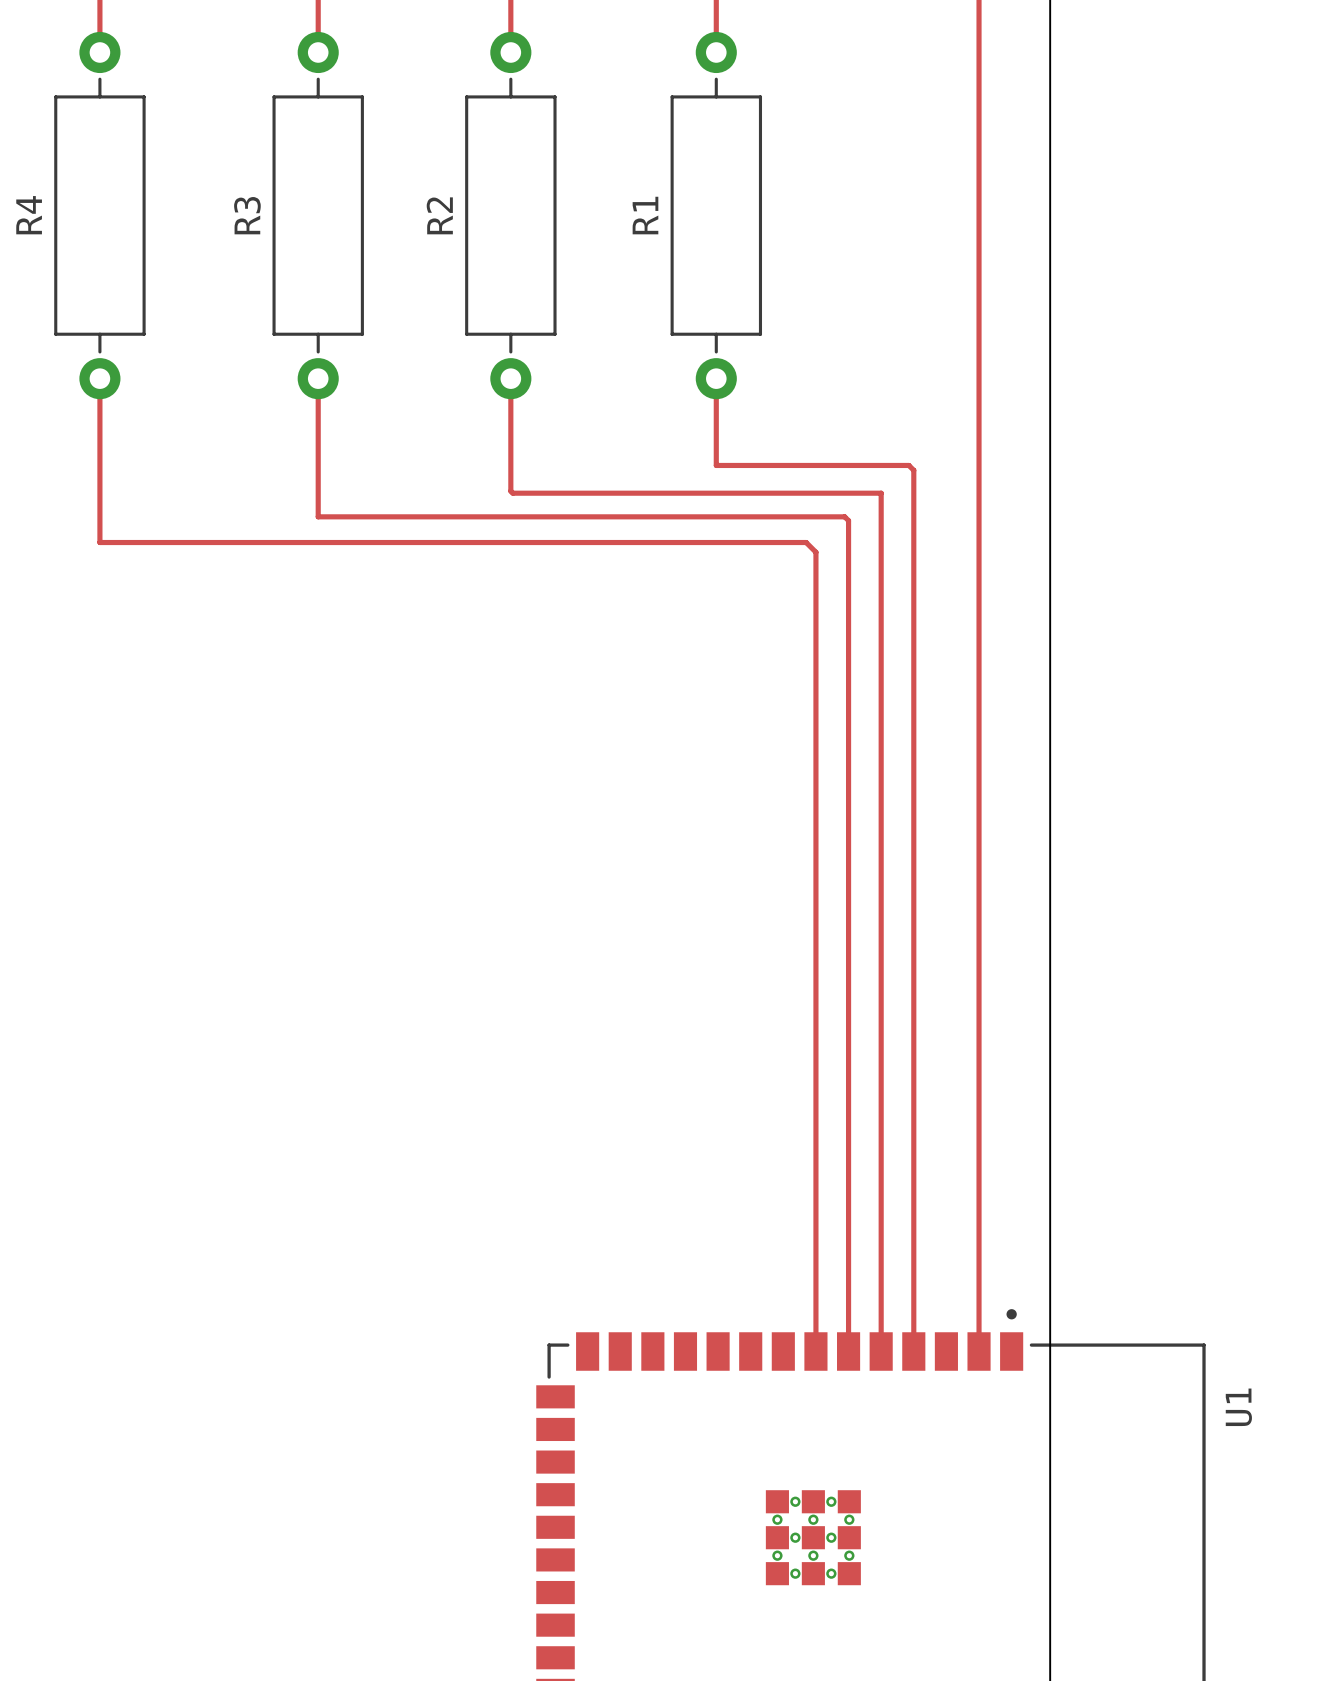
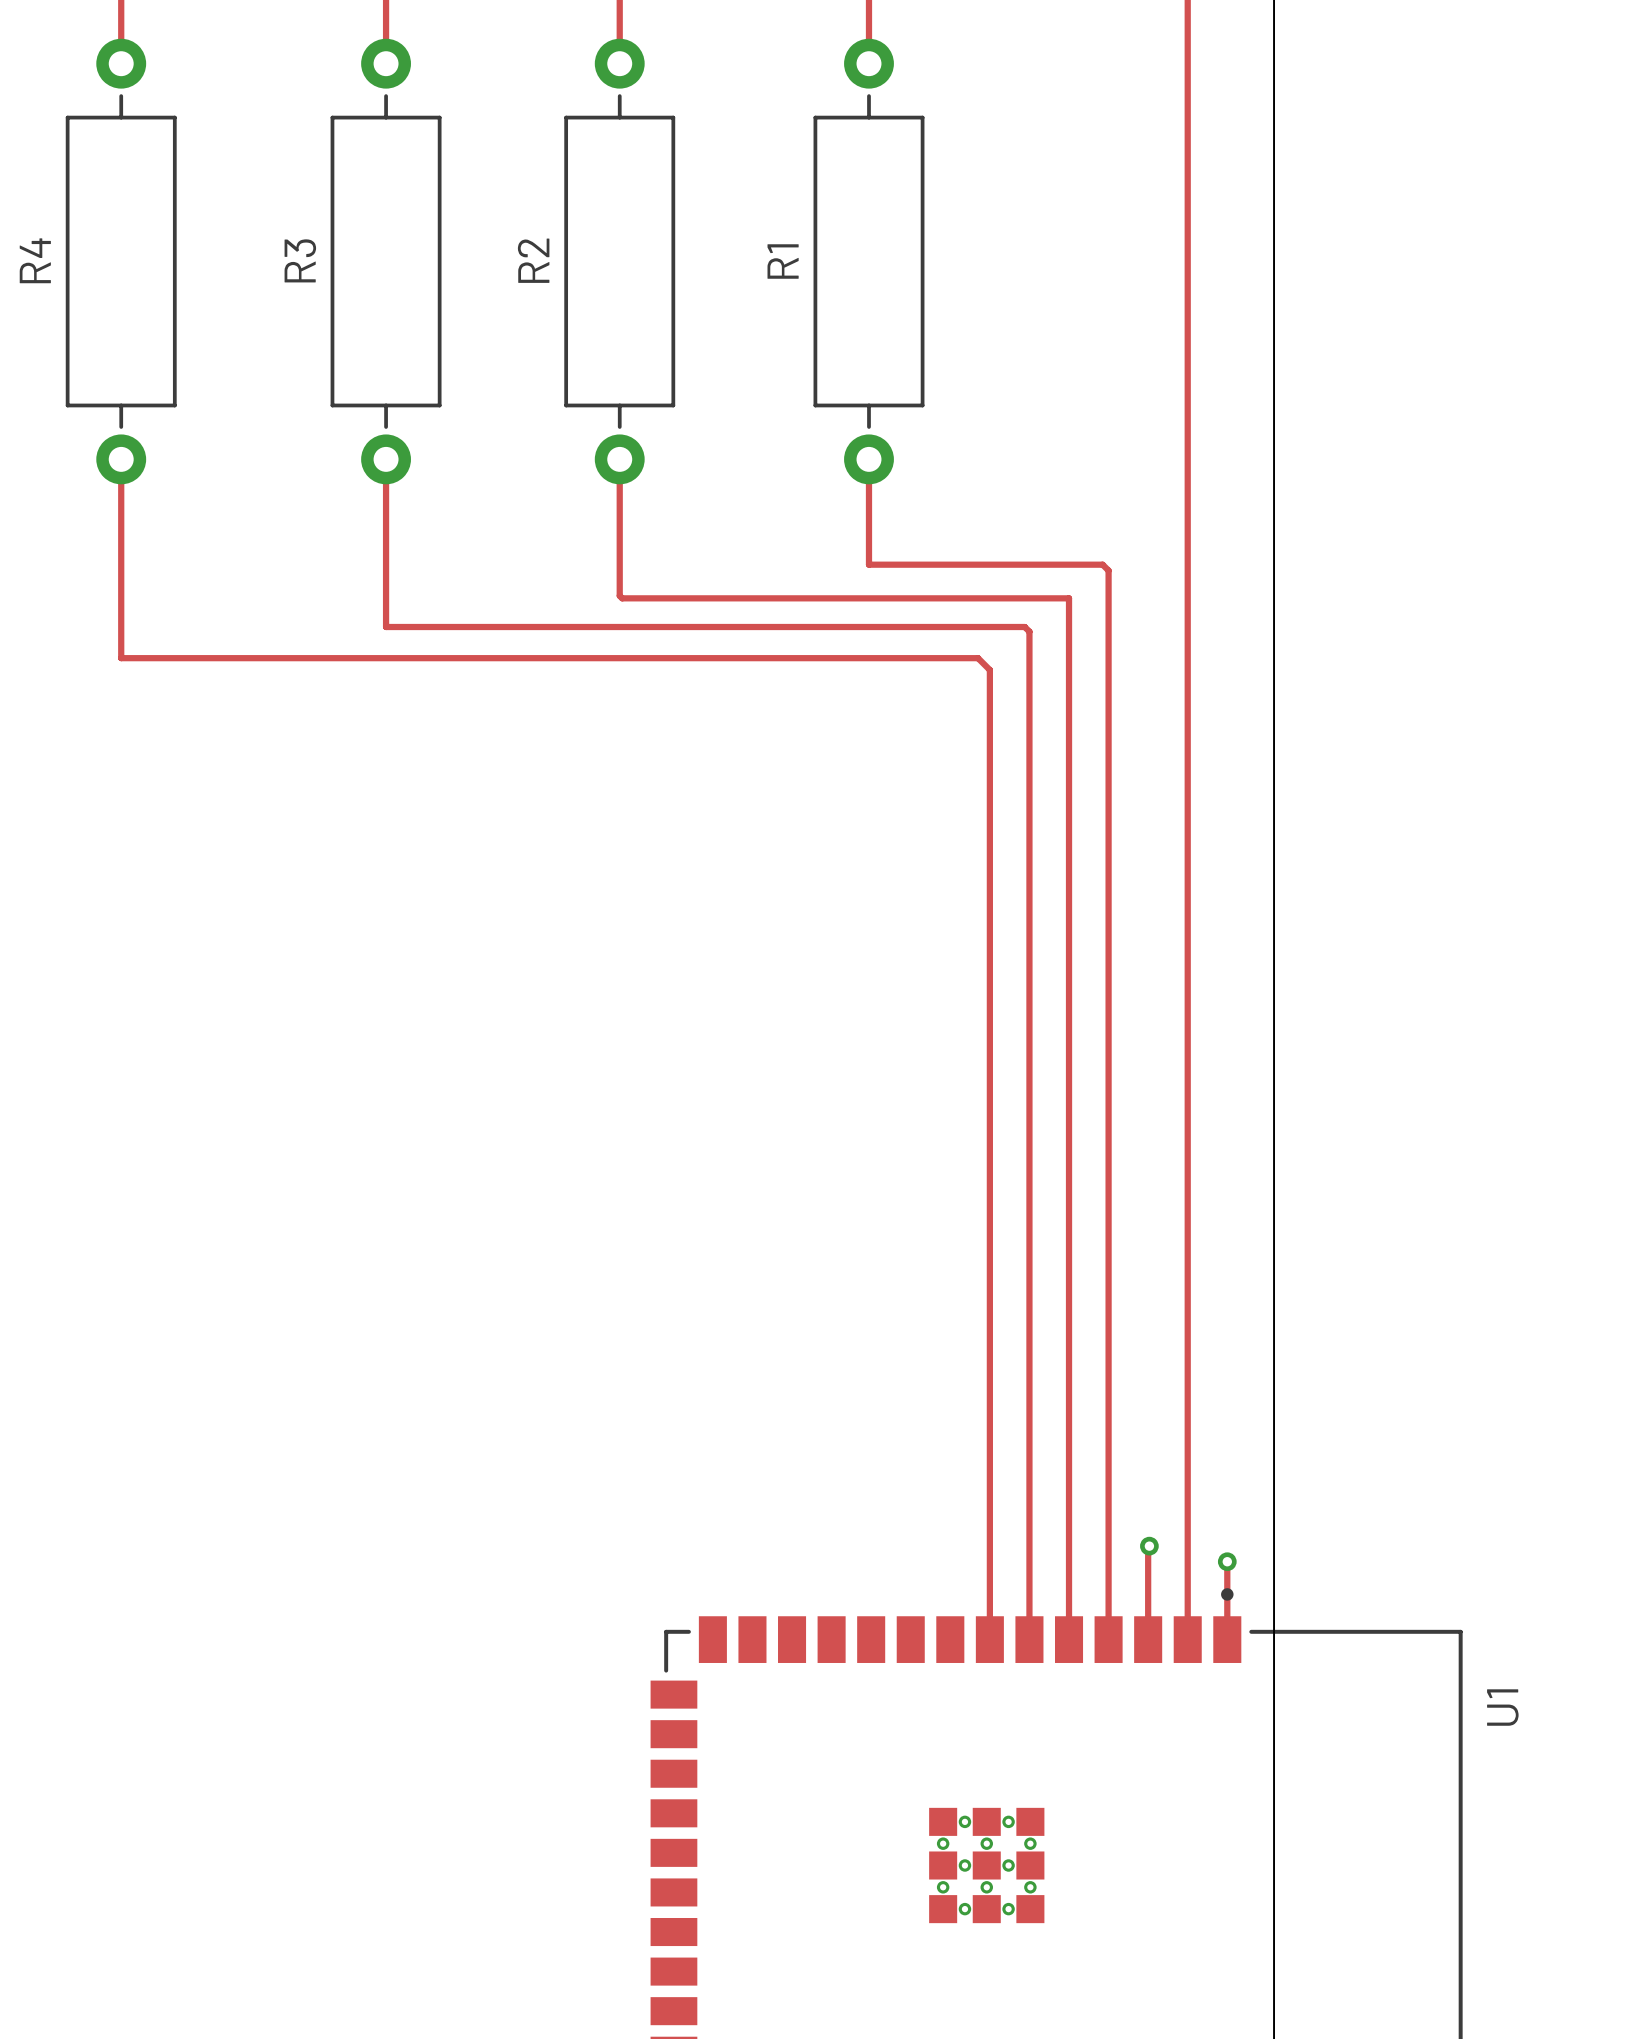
track: none -> (1149, 1546) (1148, 1639)
via: none -> (1149, 1546)
track: none -> (1227, 1561) (1227, 1639)
via: none -> (1227, 1561)

